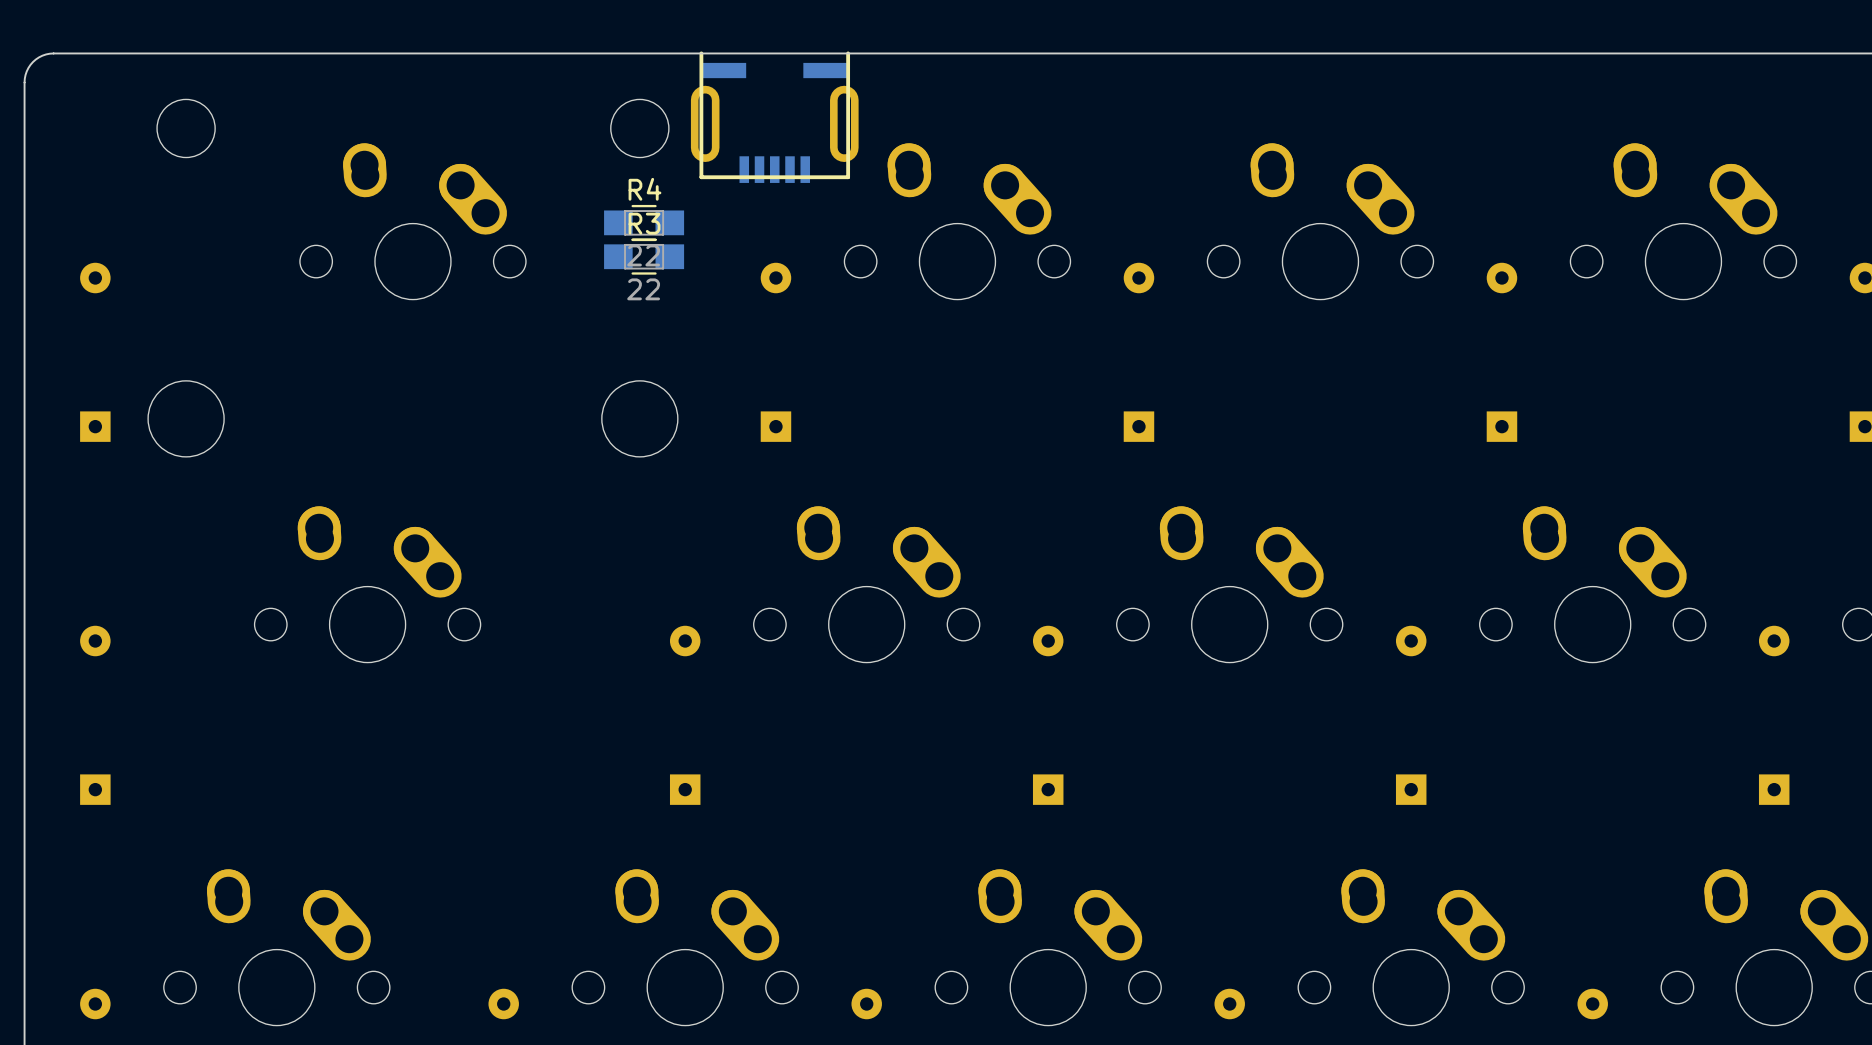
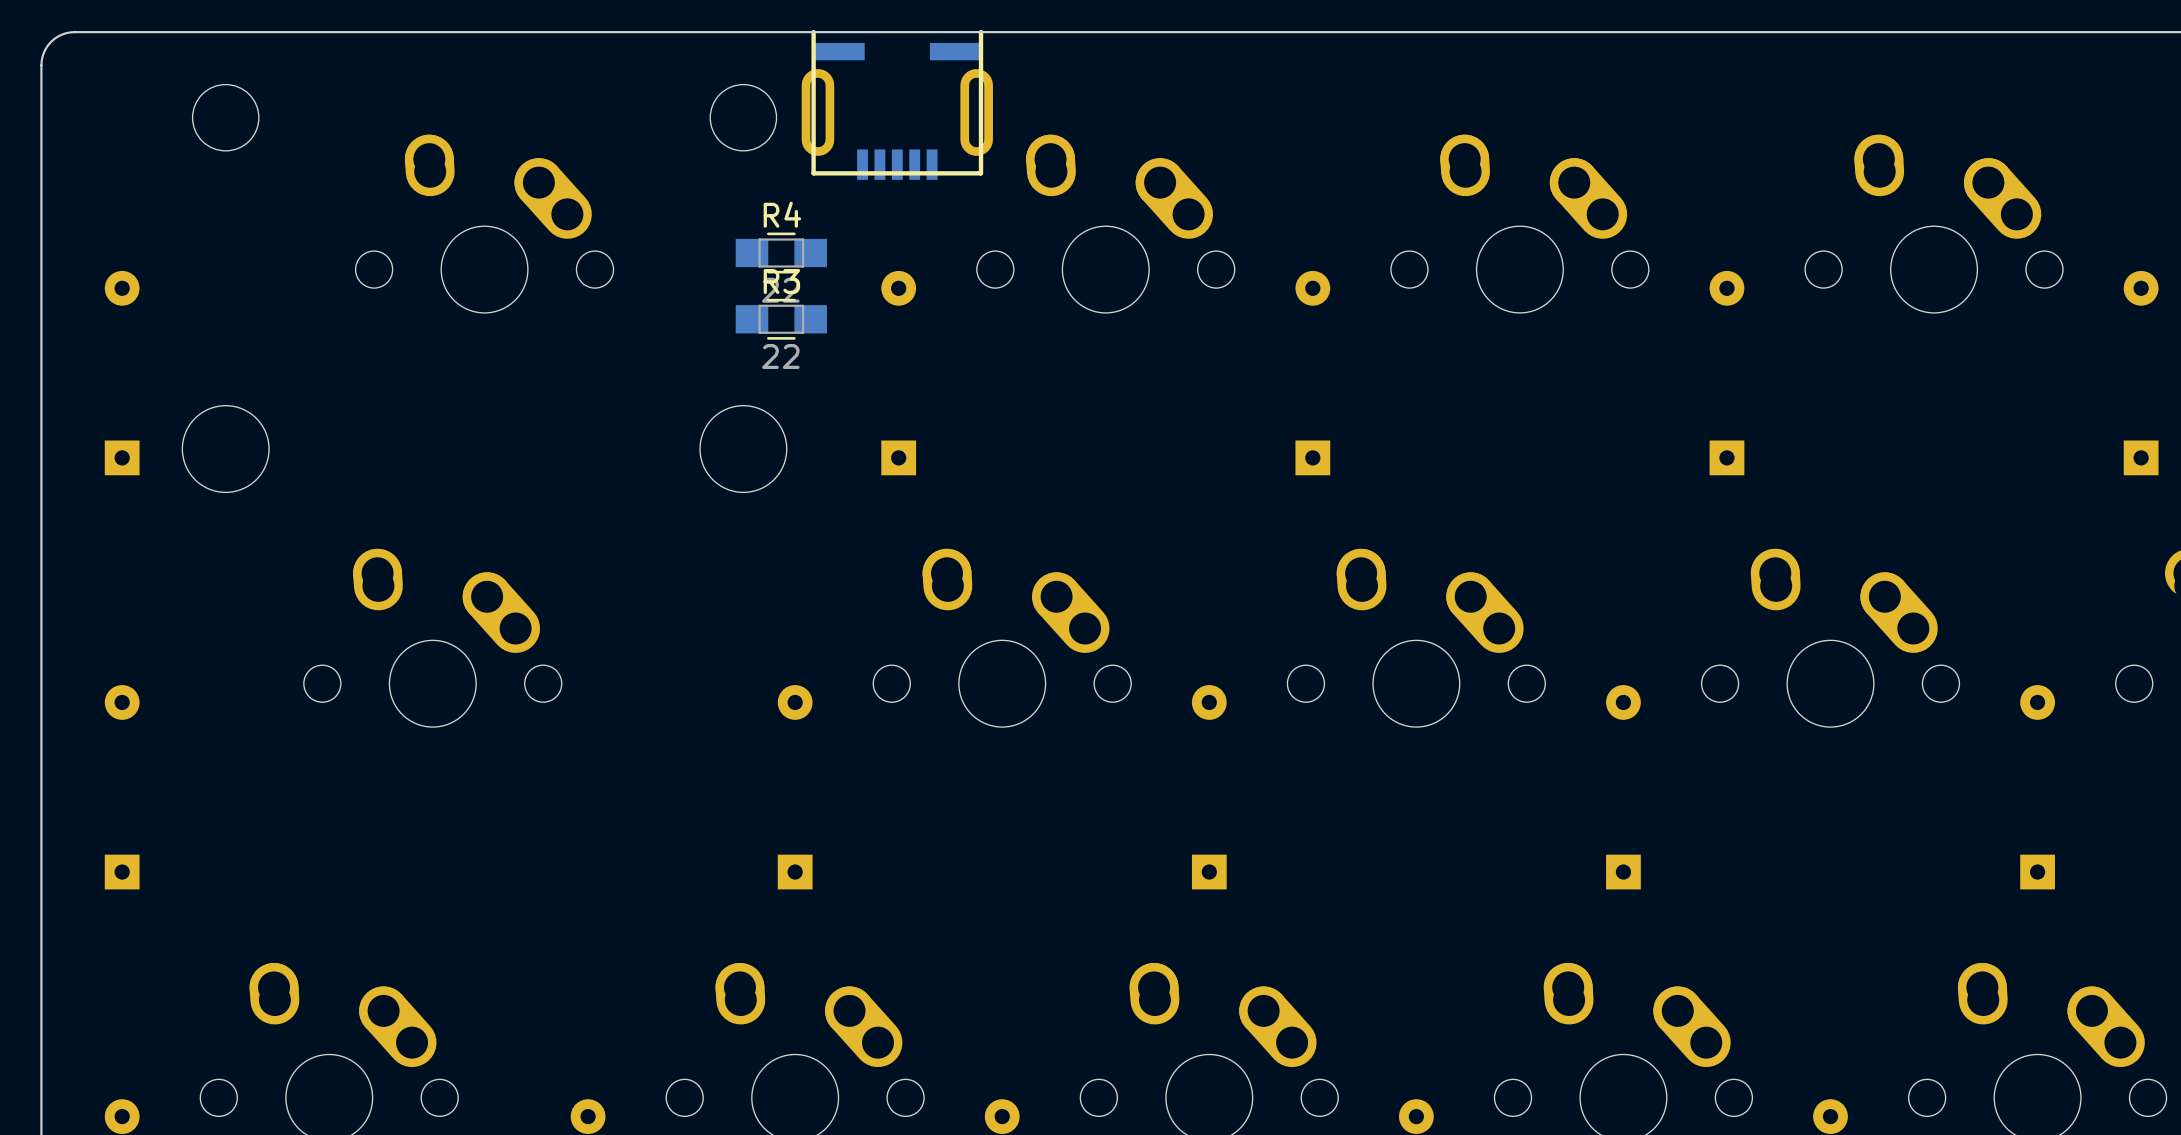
R4 position: (644, 222) -> (781, 253)
R3 position: (644, 256) -> (781, 319)

